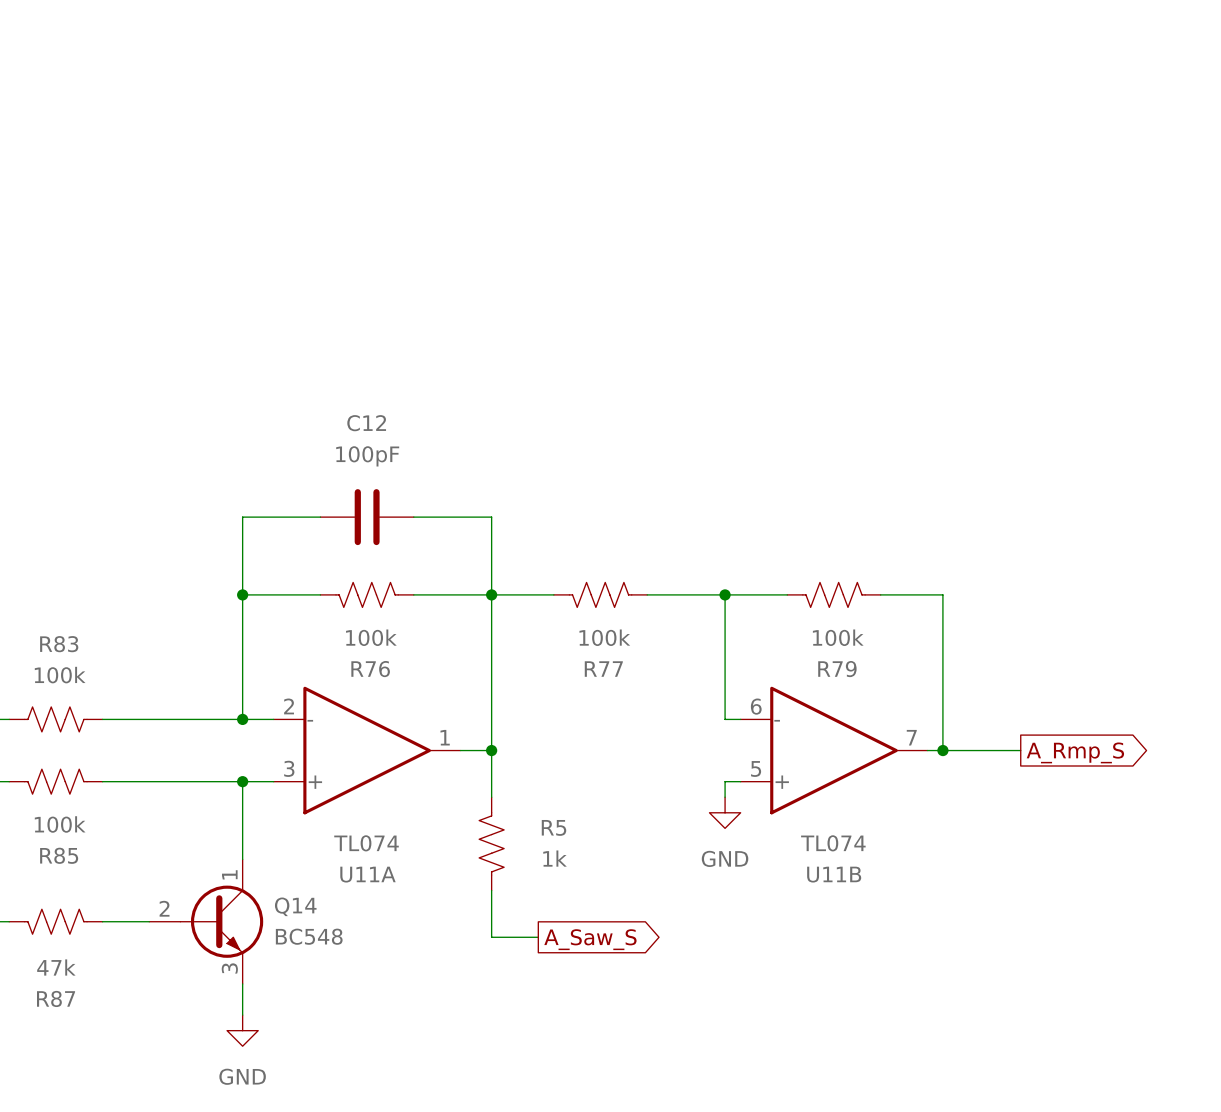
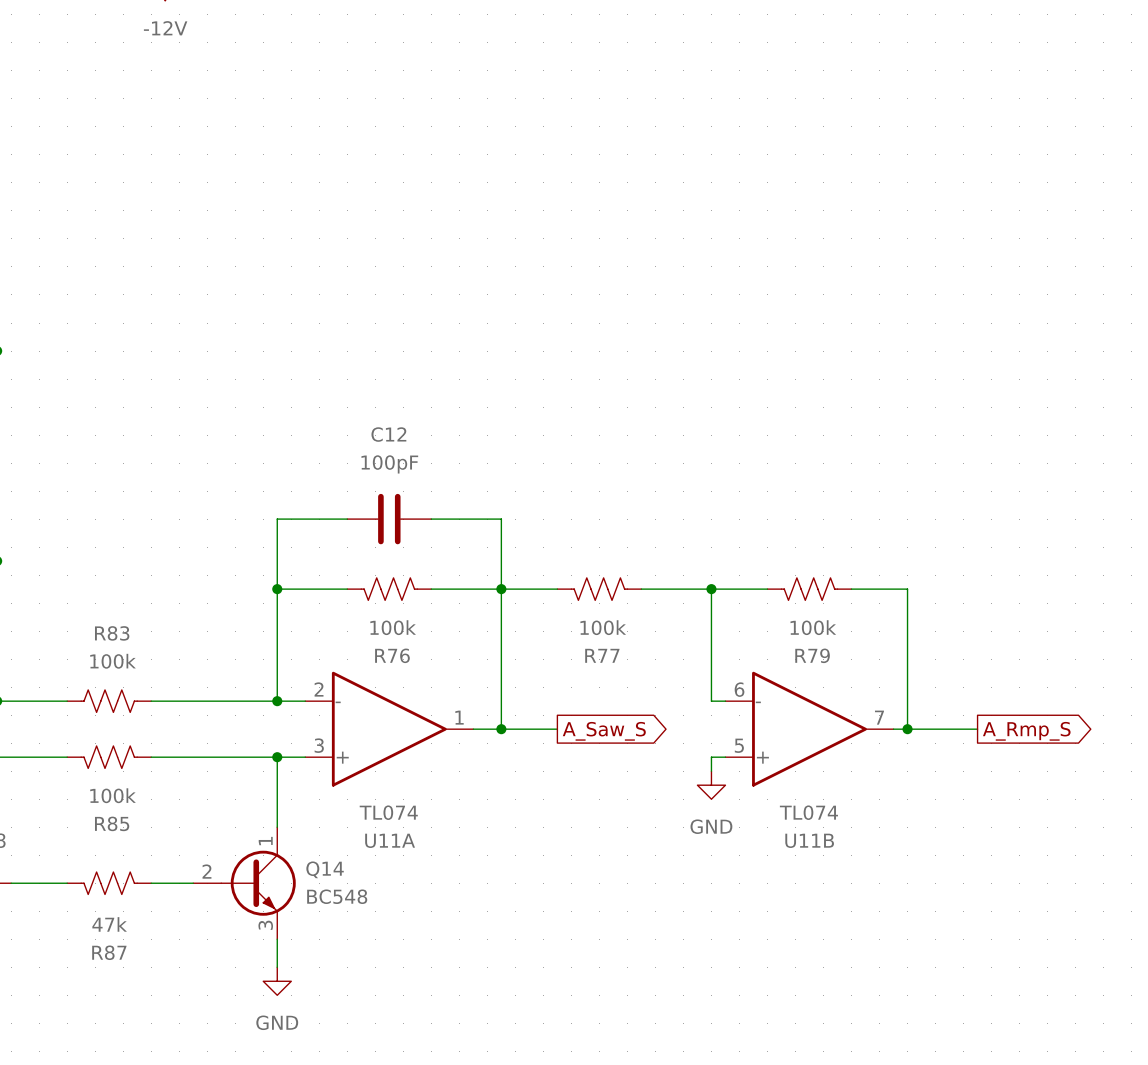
wire: (491, 750) (491, 797) -> (501, 729) (557, 729)
R5: 1k (491, 843) -> none
wire: (491, 890) (491, 937) (538, 937) -> none
global label position: A_Saw_S (590, 939) -> A_Saw_S (604, 731)

